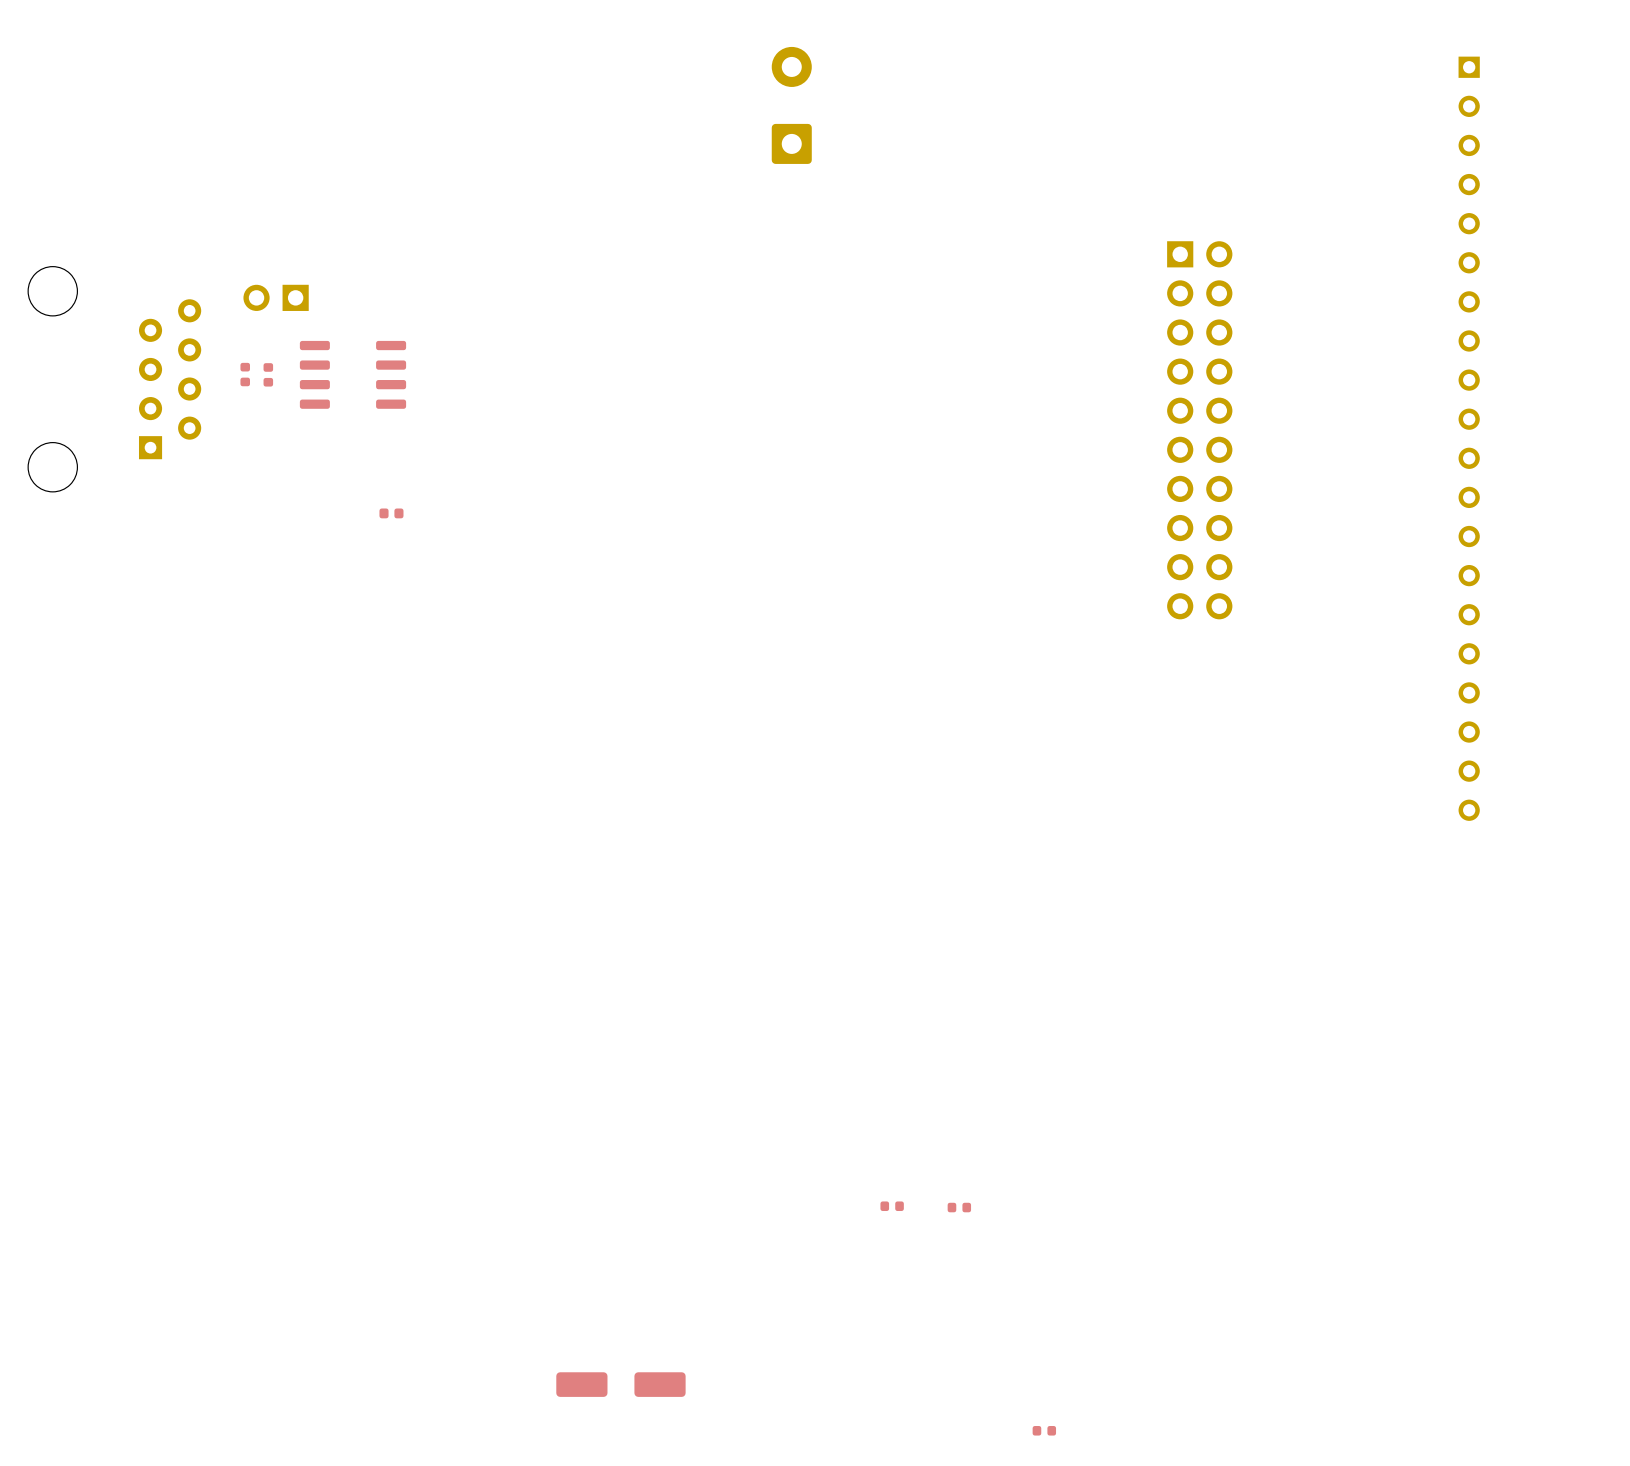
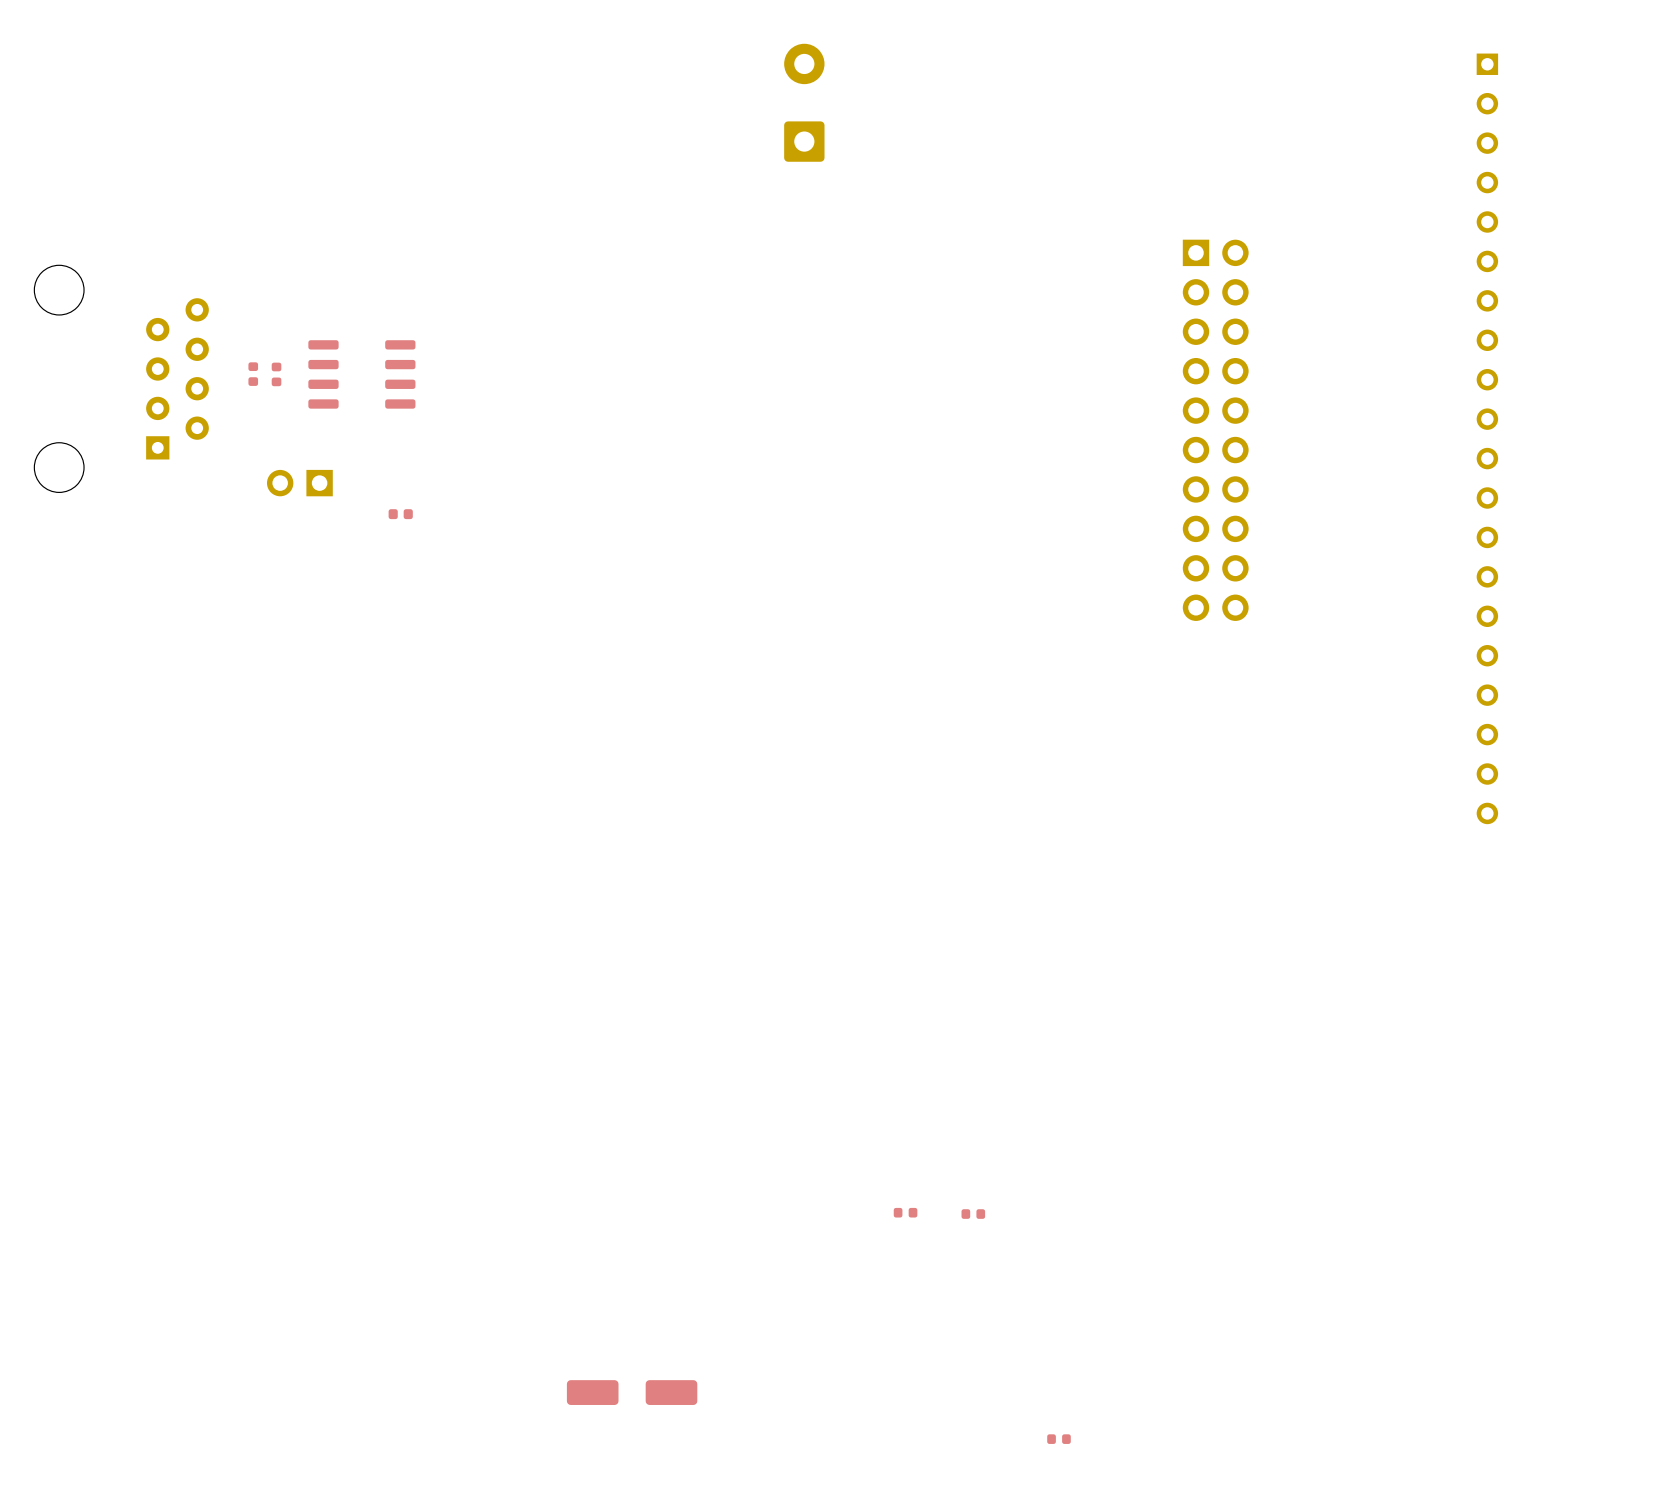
part position: (276, 297) -> (299, 483)

